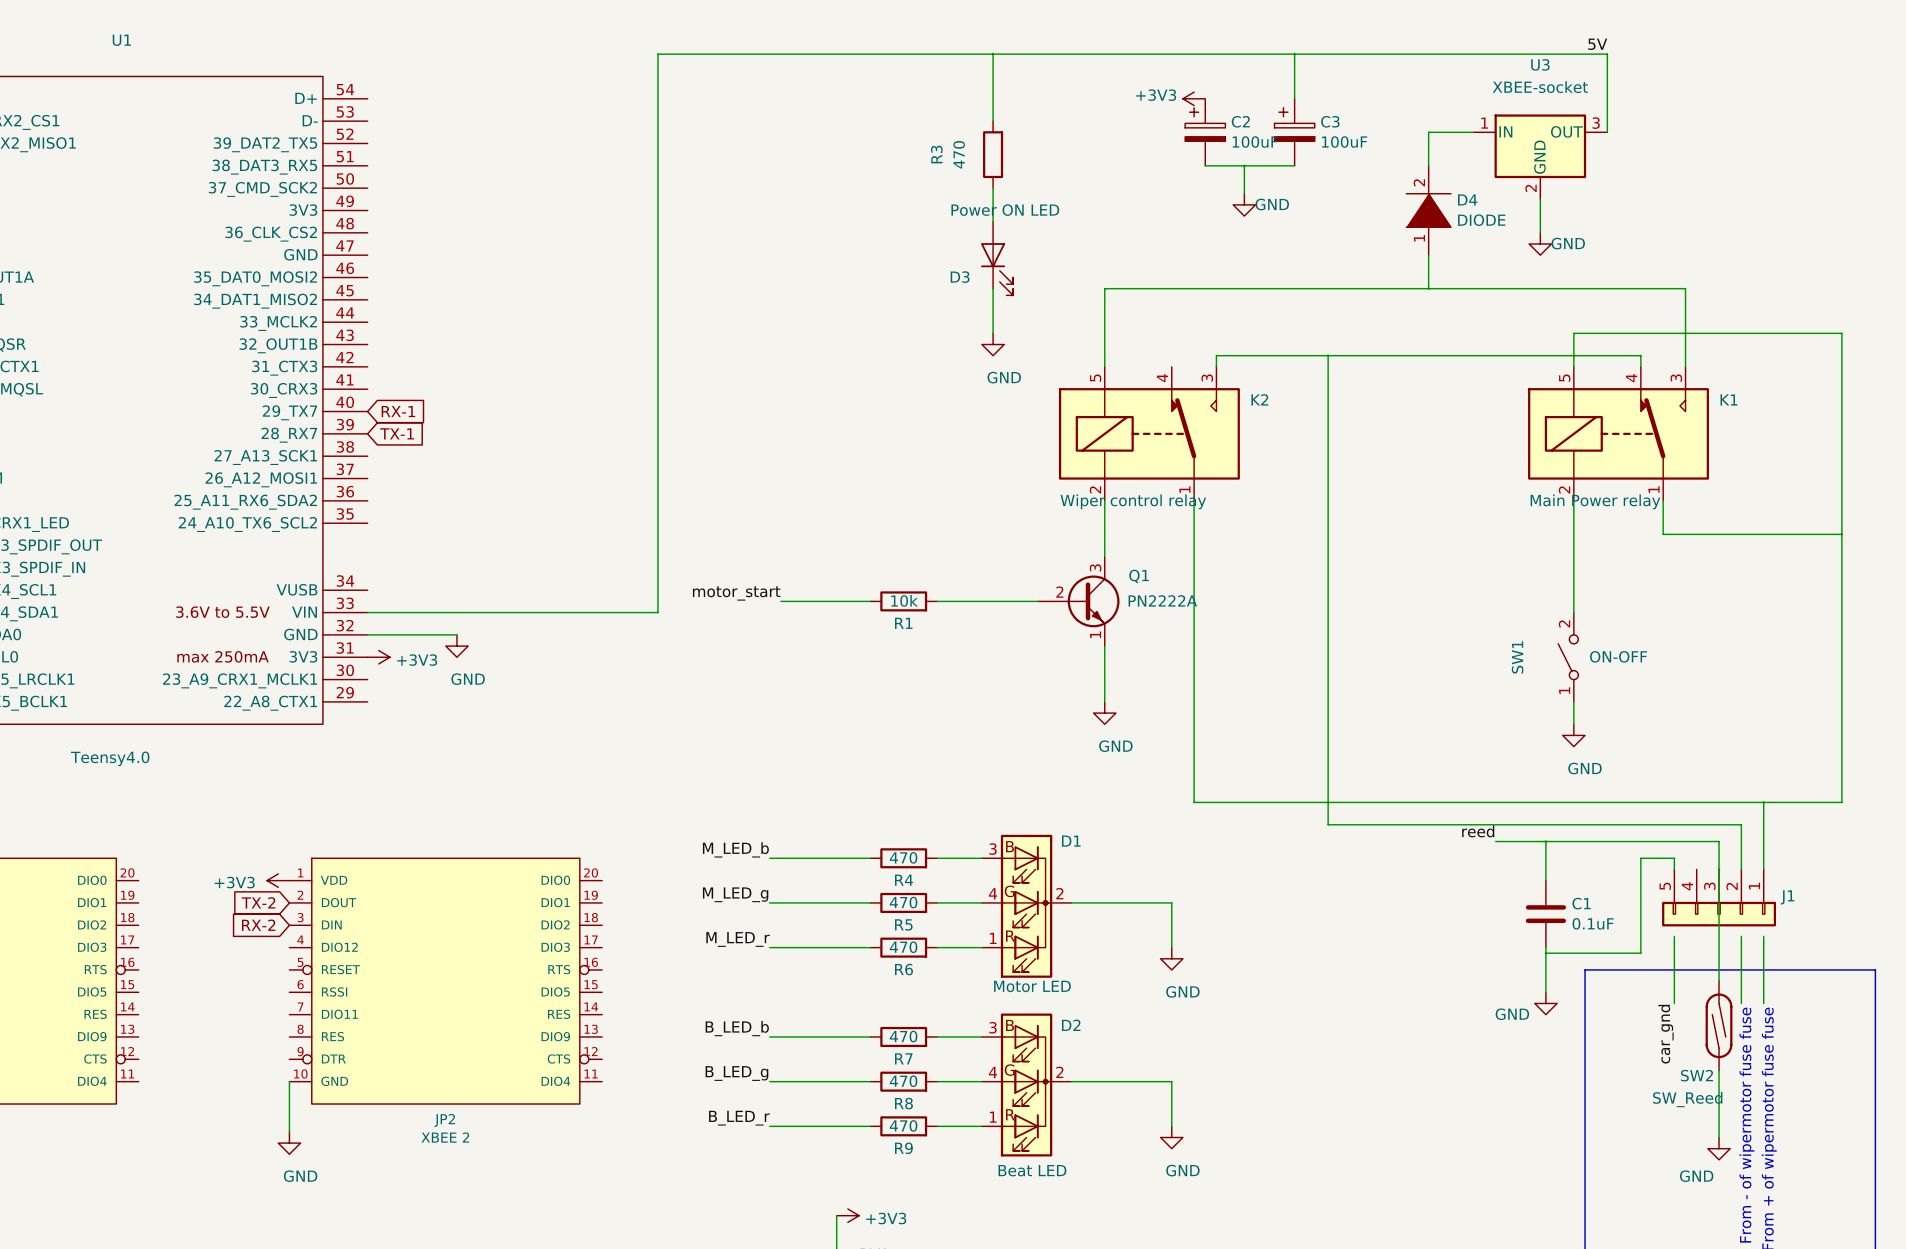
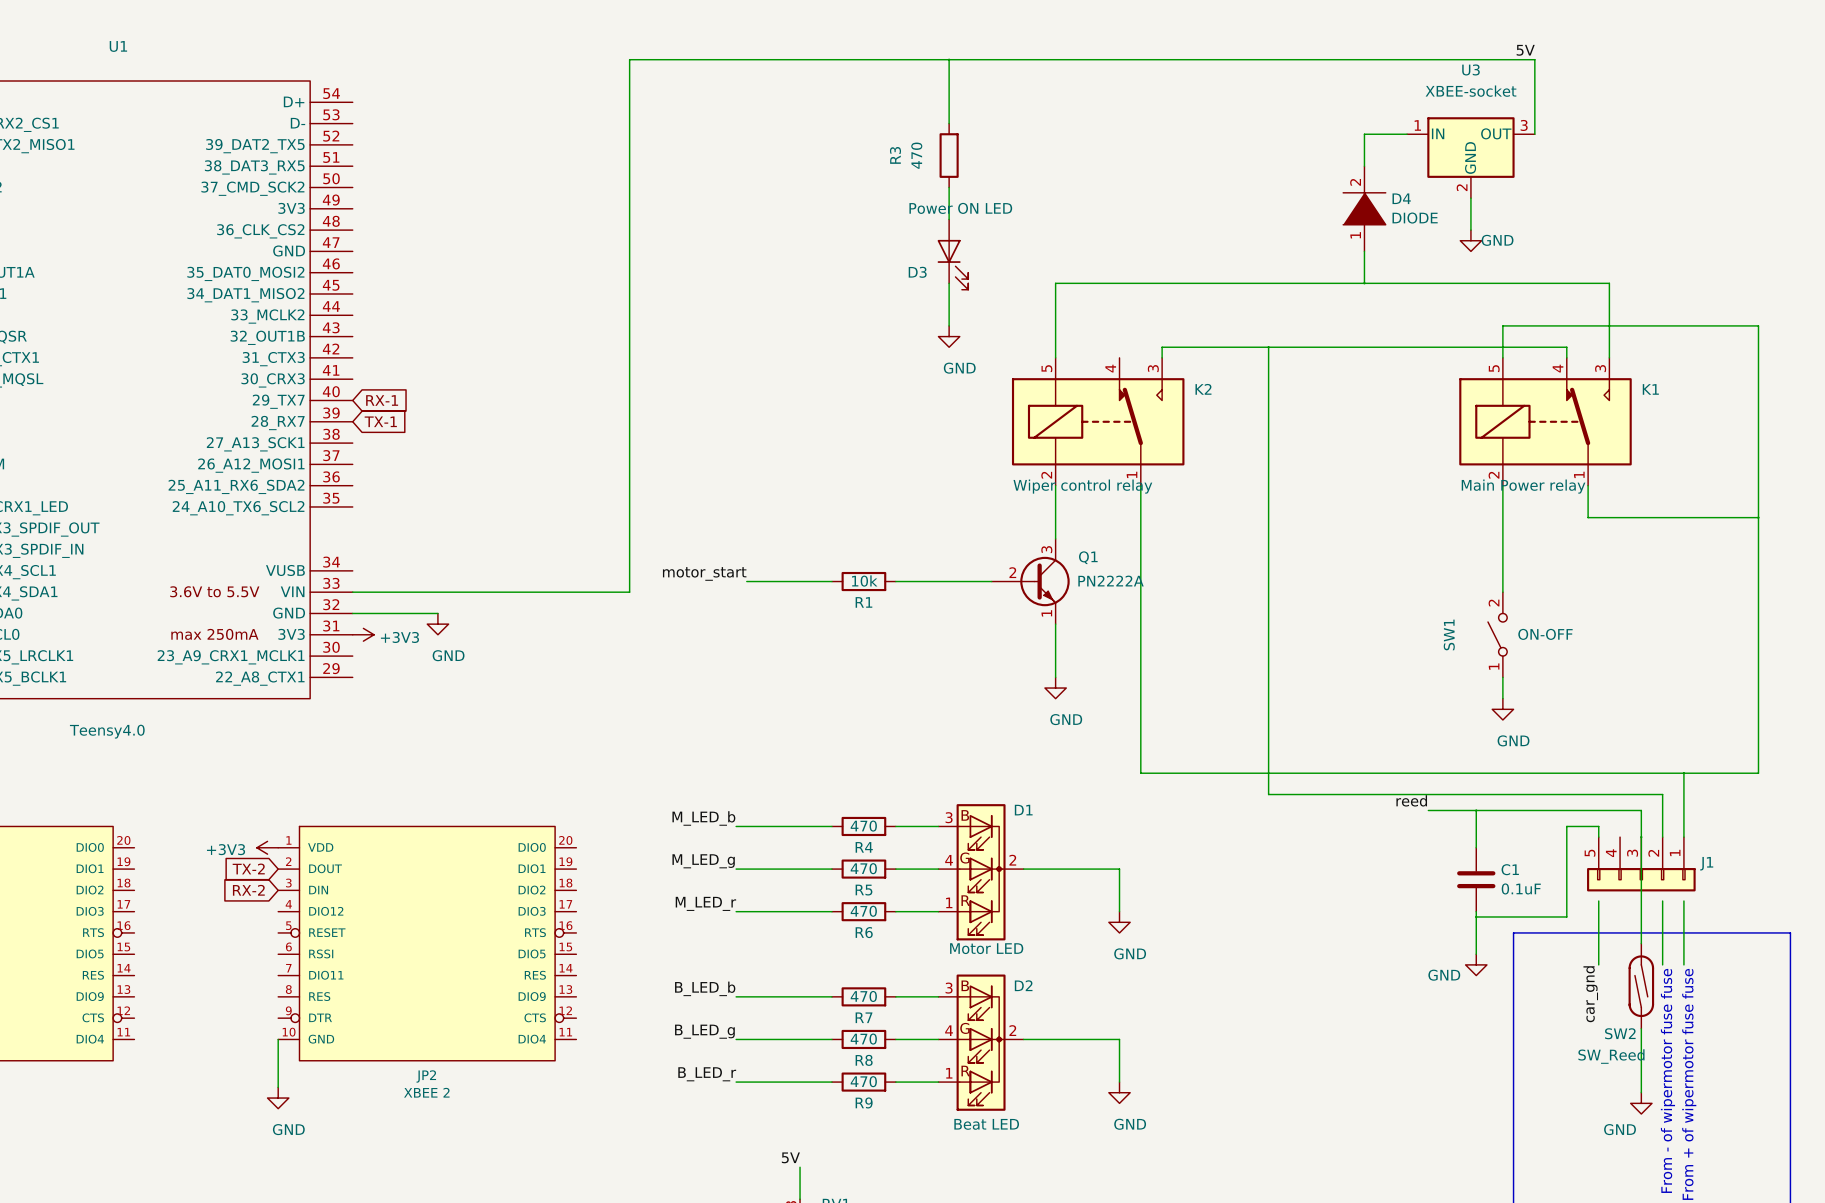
wire: (1294, 54) (1294, 98) -> none
power symbol: +3V3 (1194, 98) -> none
C2: 100uF (1205, 132) -> none
C3: 100uF (1294, 132) -> none
wire: (1205, 165) (1294, 165) -> none
wire: (1244, 165) (1244, 193) -> none
power symbol: GND (1244, 204) -> none
label: none -> 5V (790, 1157)
power symbol: +3V3 (847, 1215) -> none

